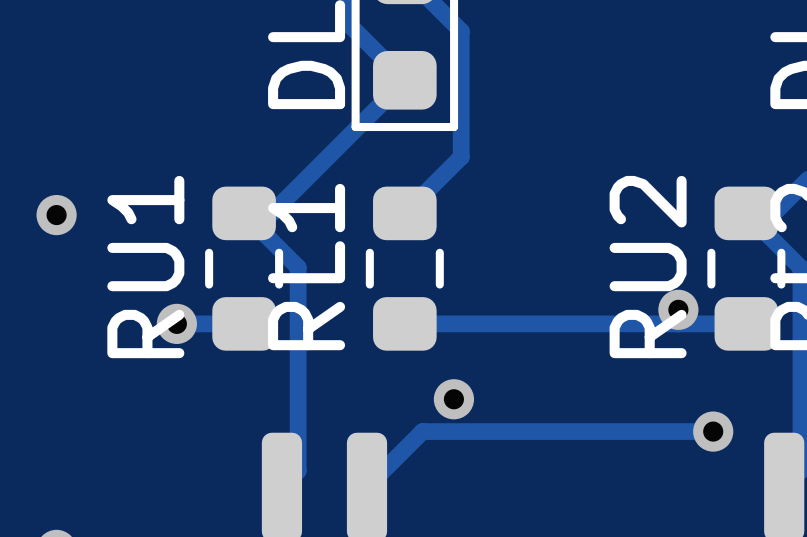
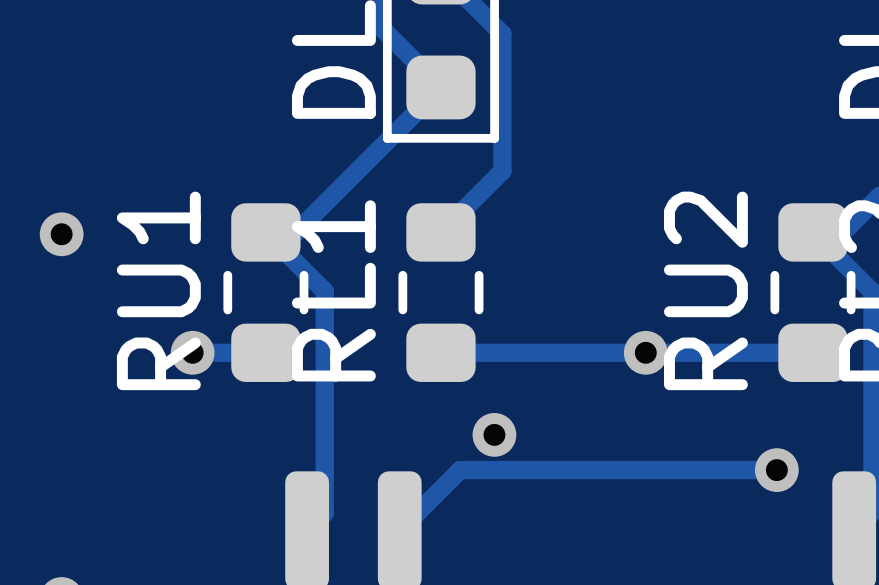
via position: (678, 309) -> (645, 352)

